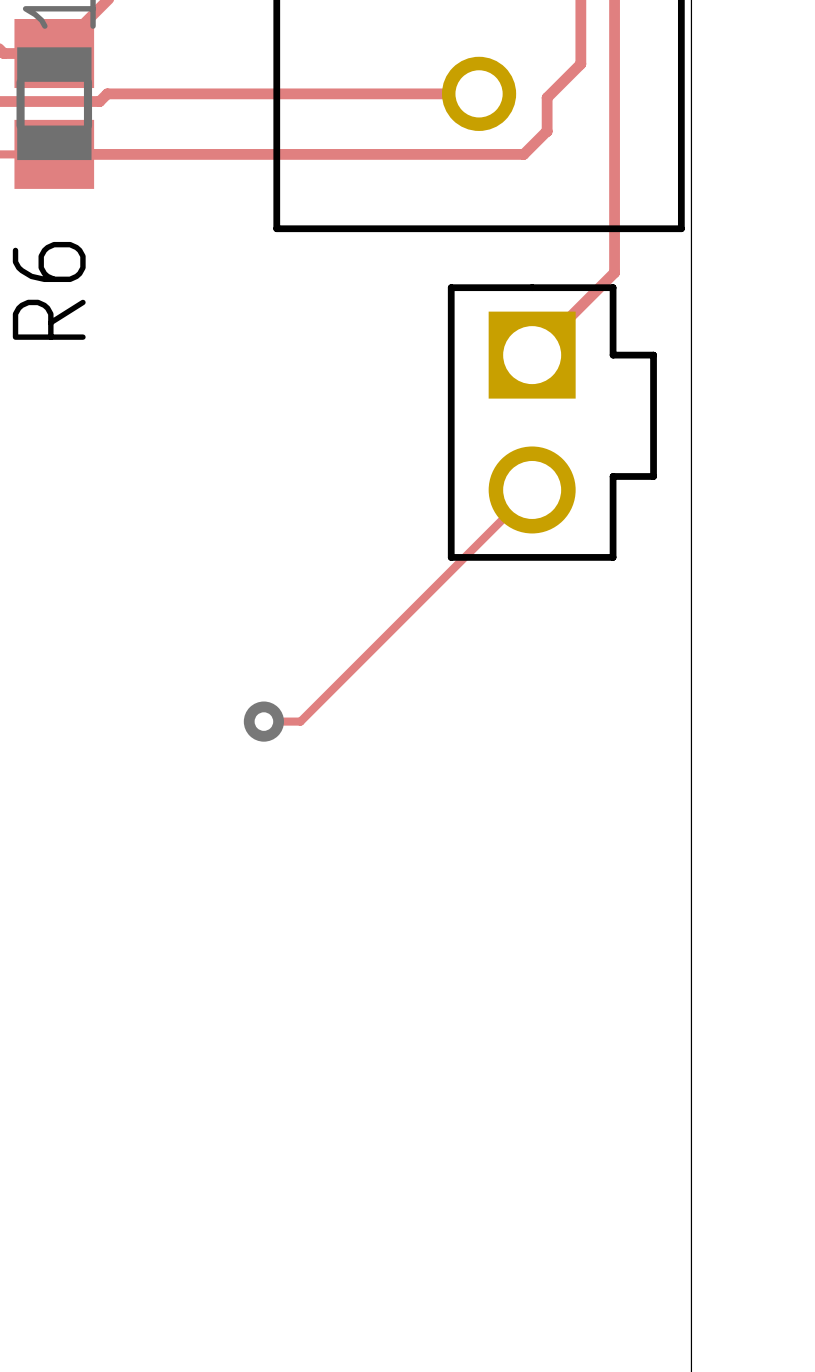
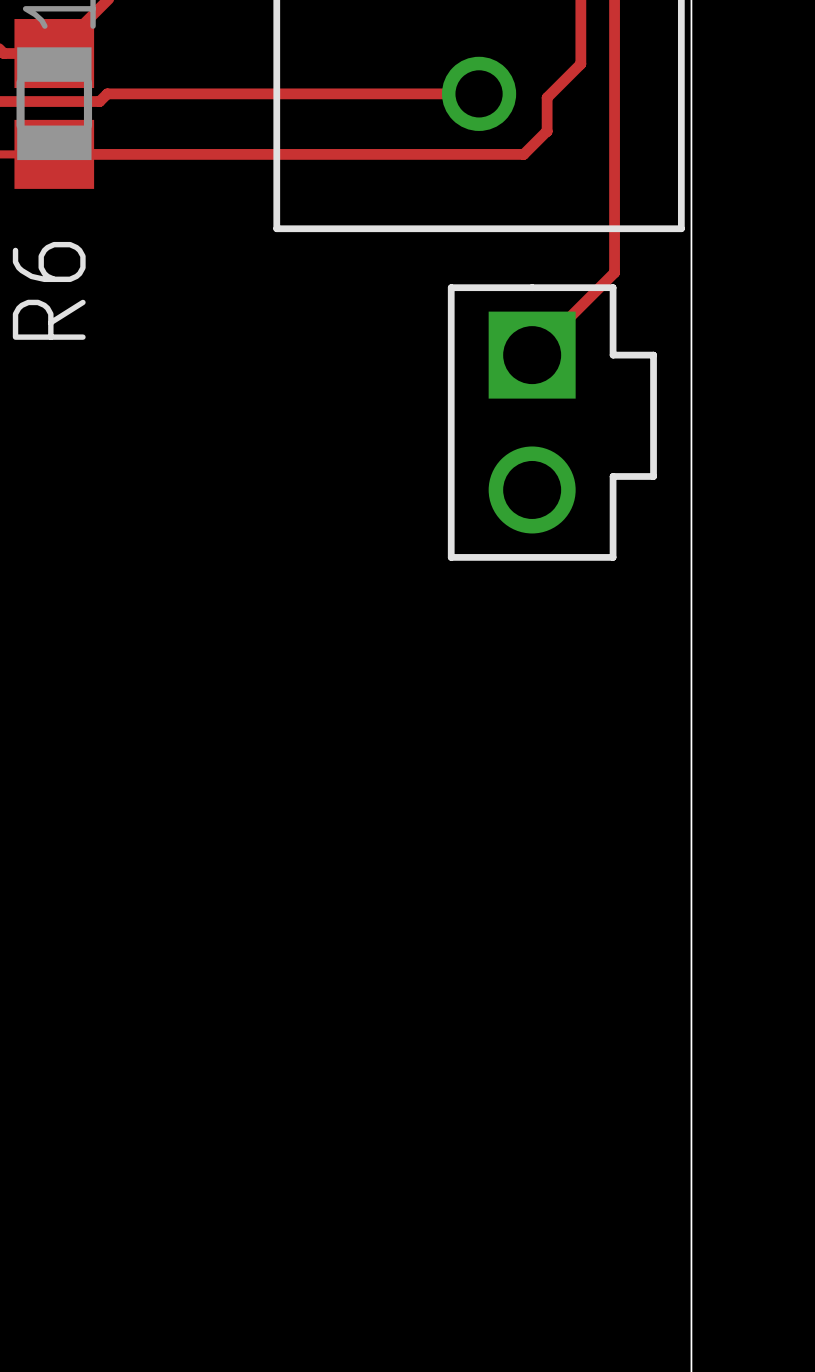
track: (532, 489) (300, 721) (263, 721) -> none
via: (263, 721) -> none

